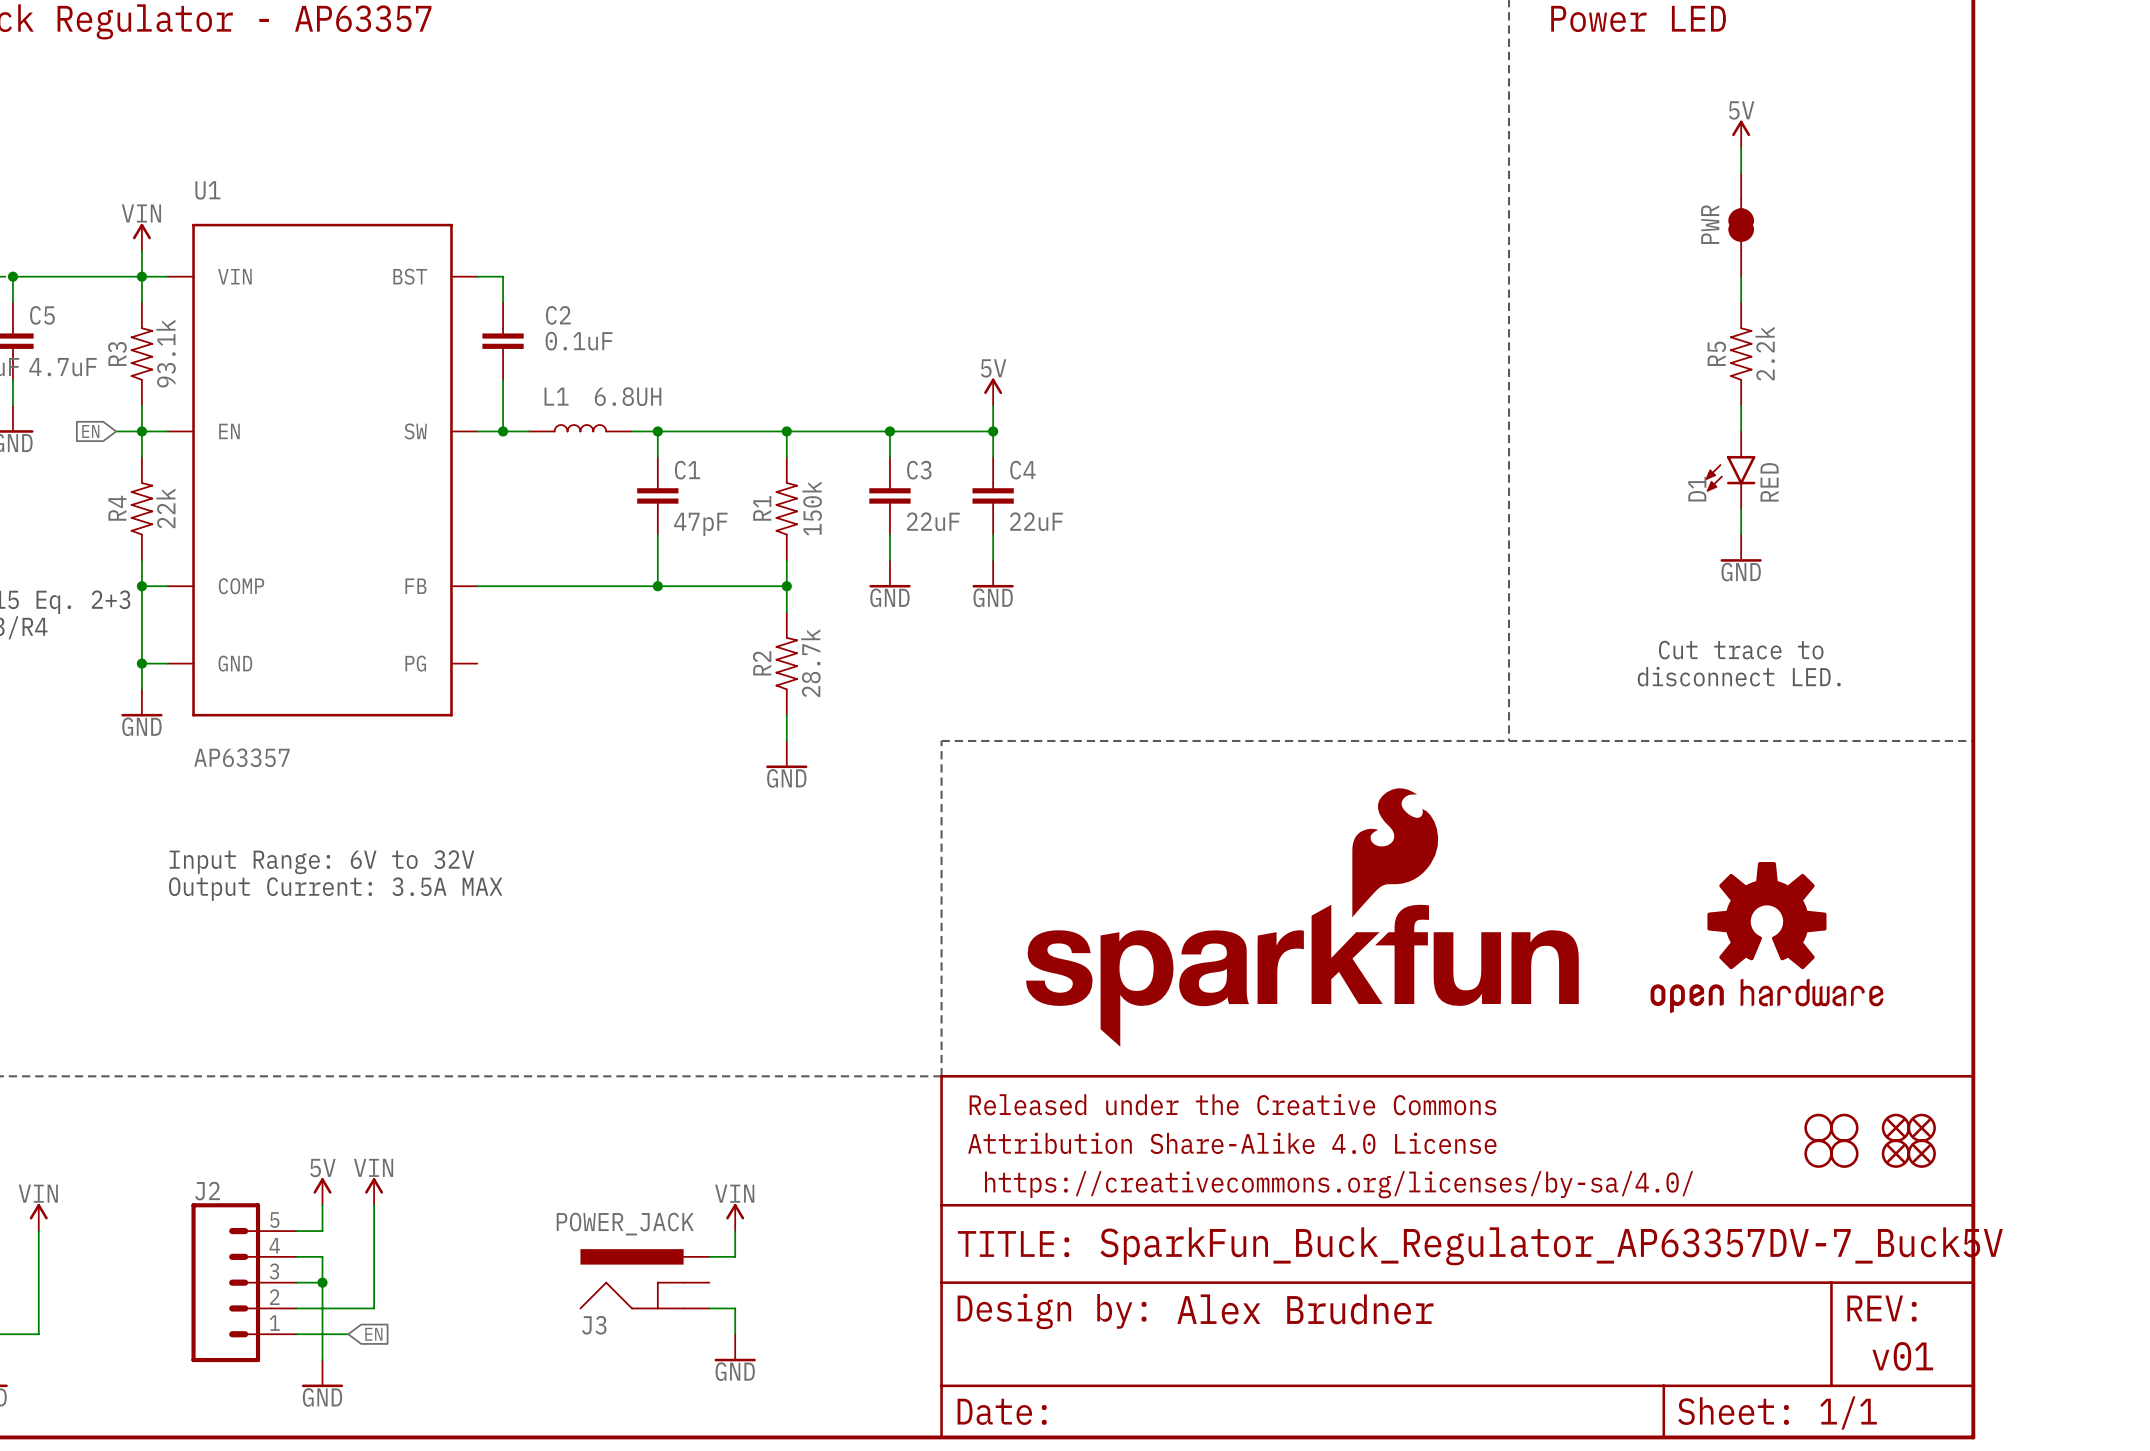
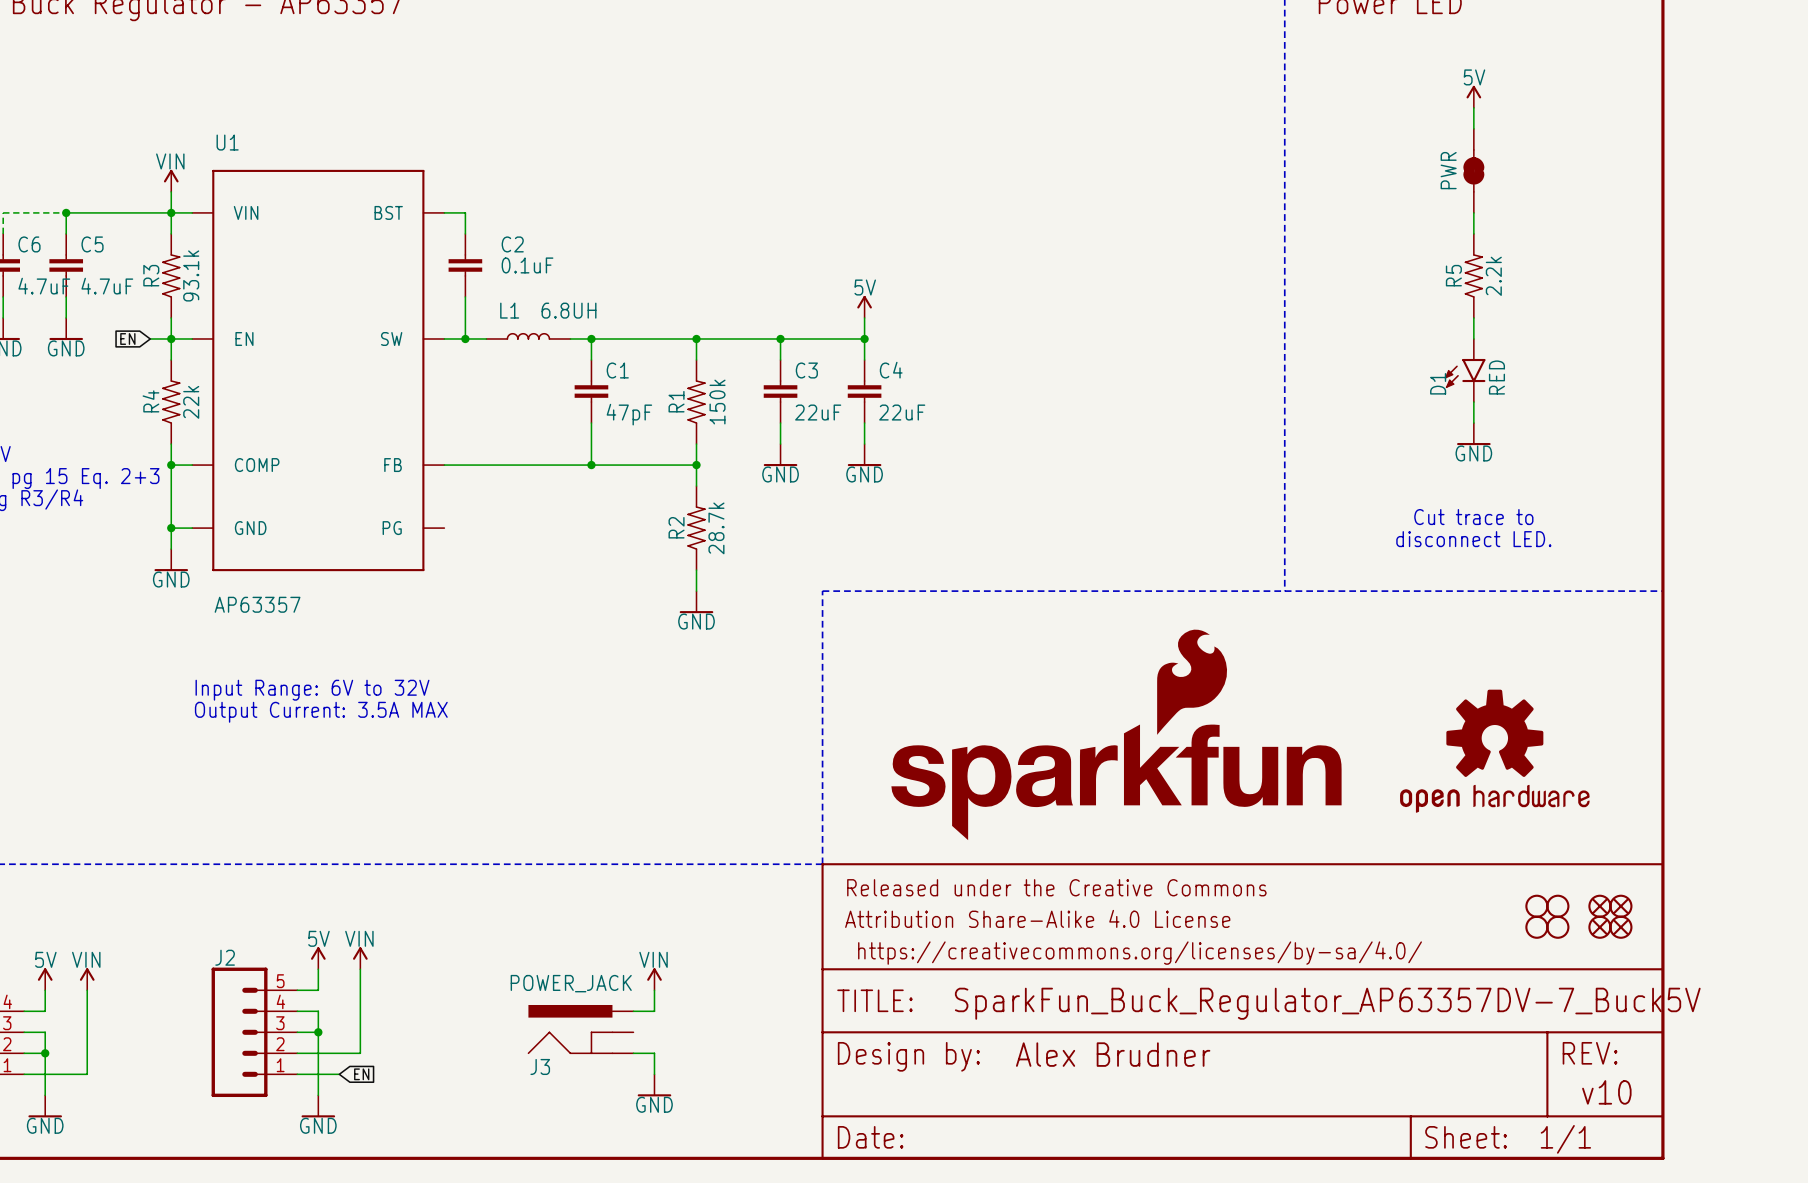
part text: v01 (1902, 1356) -> v10 (1606, 1092)

